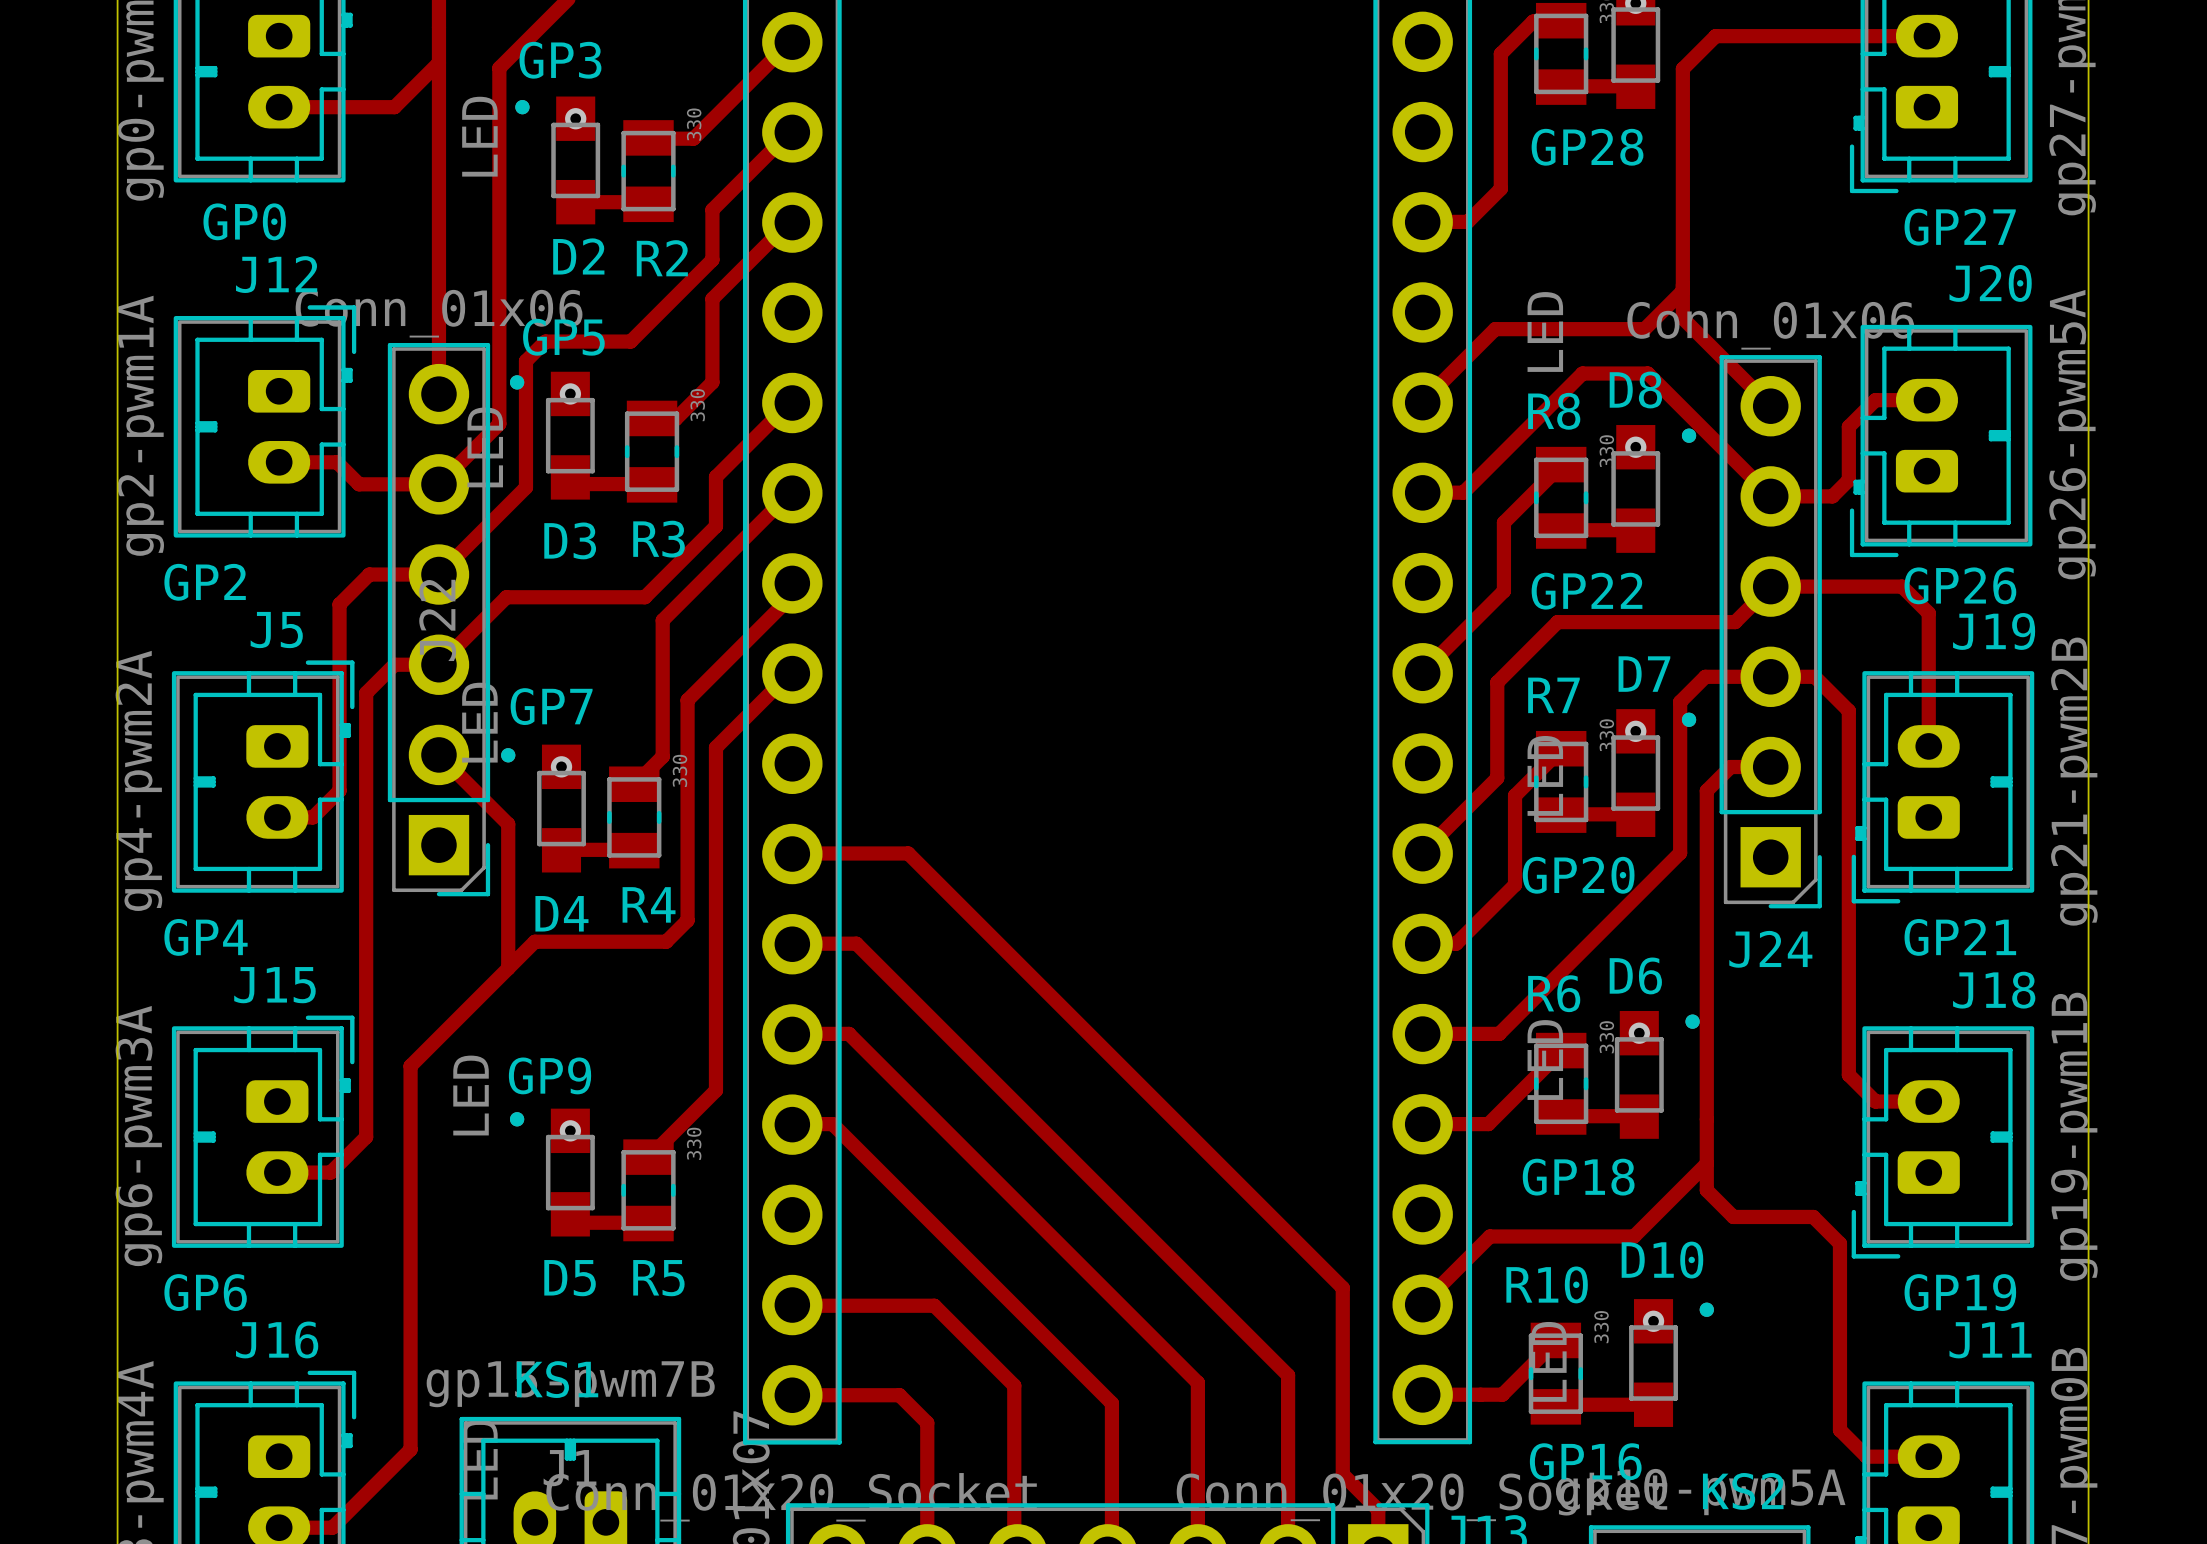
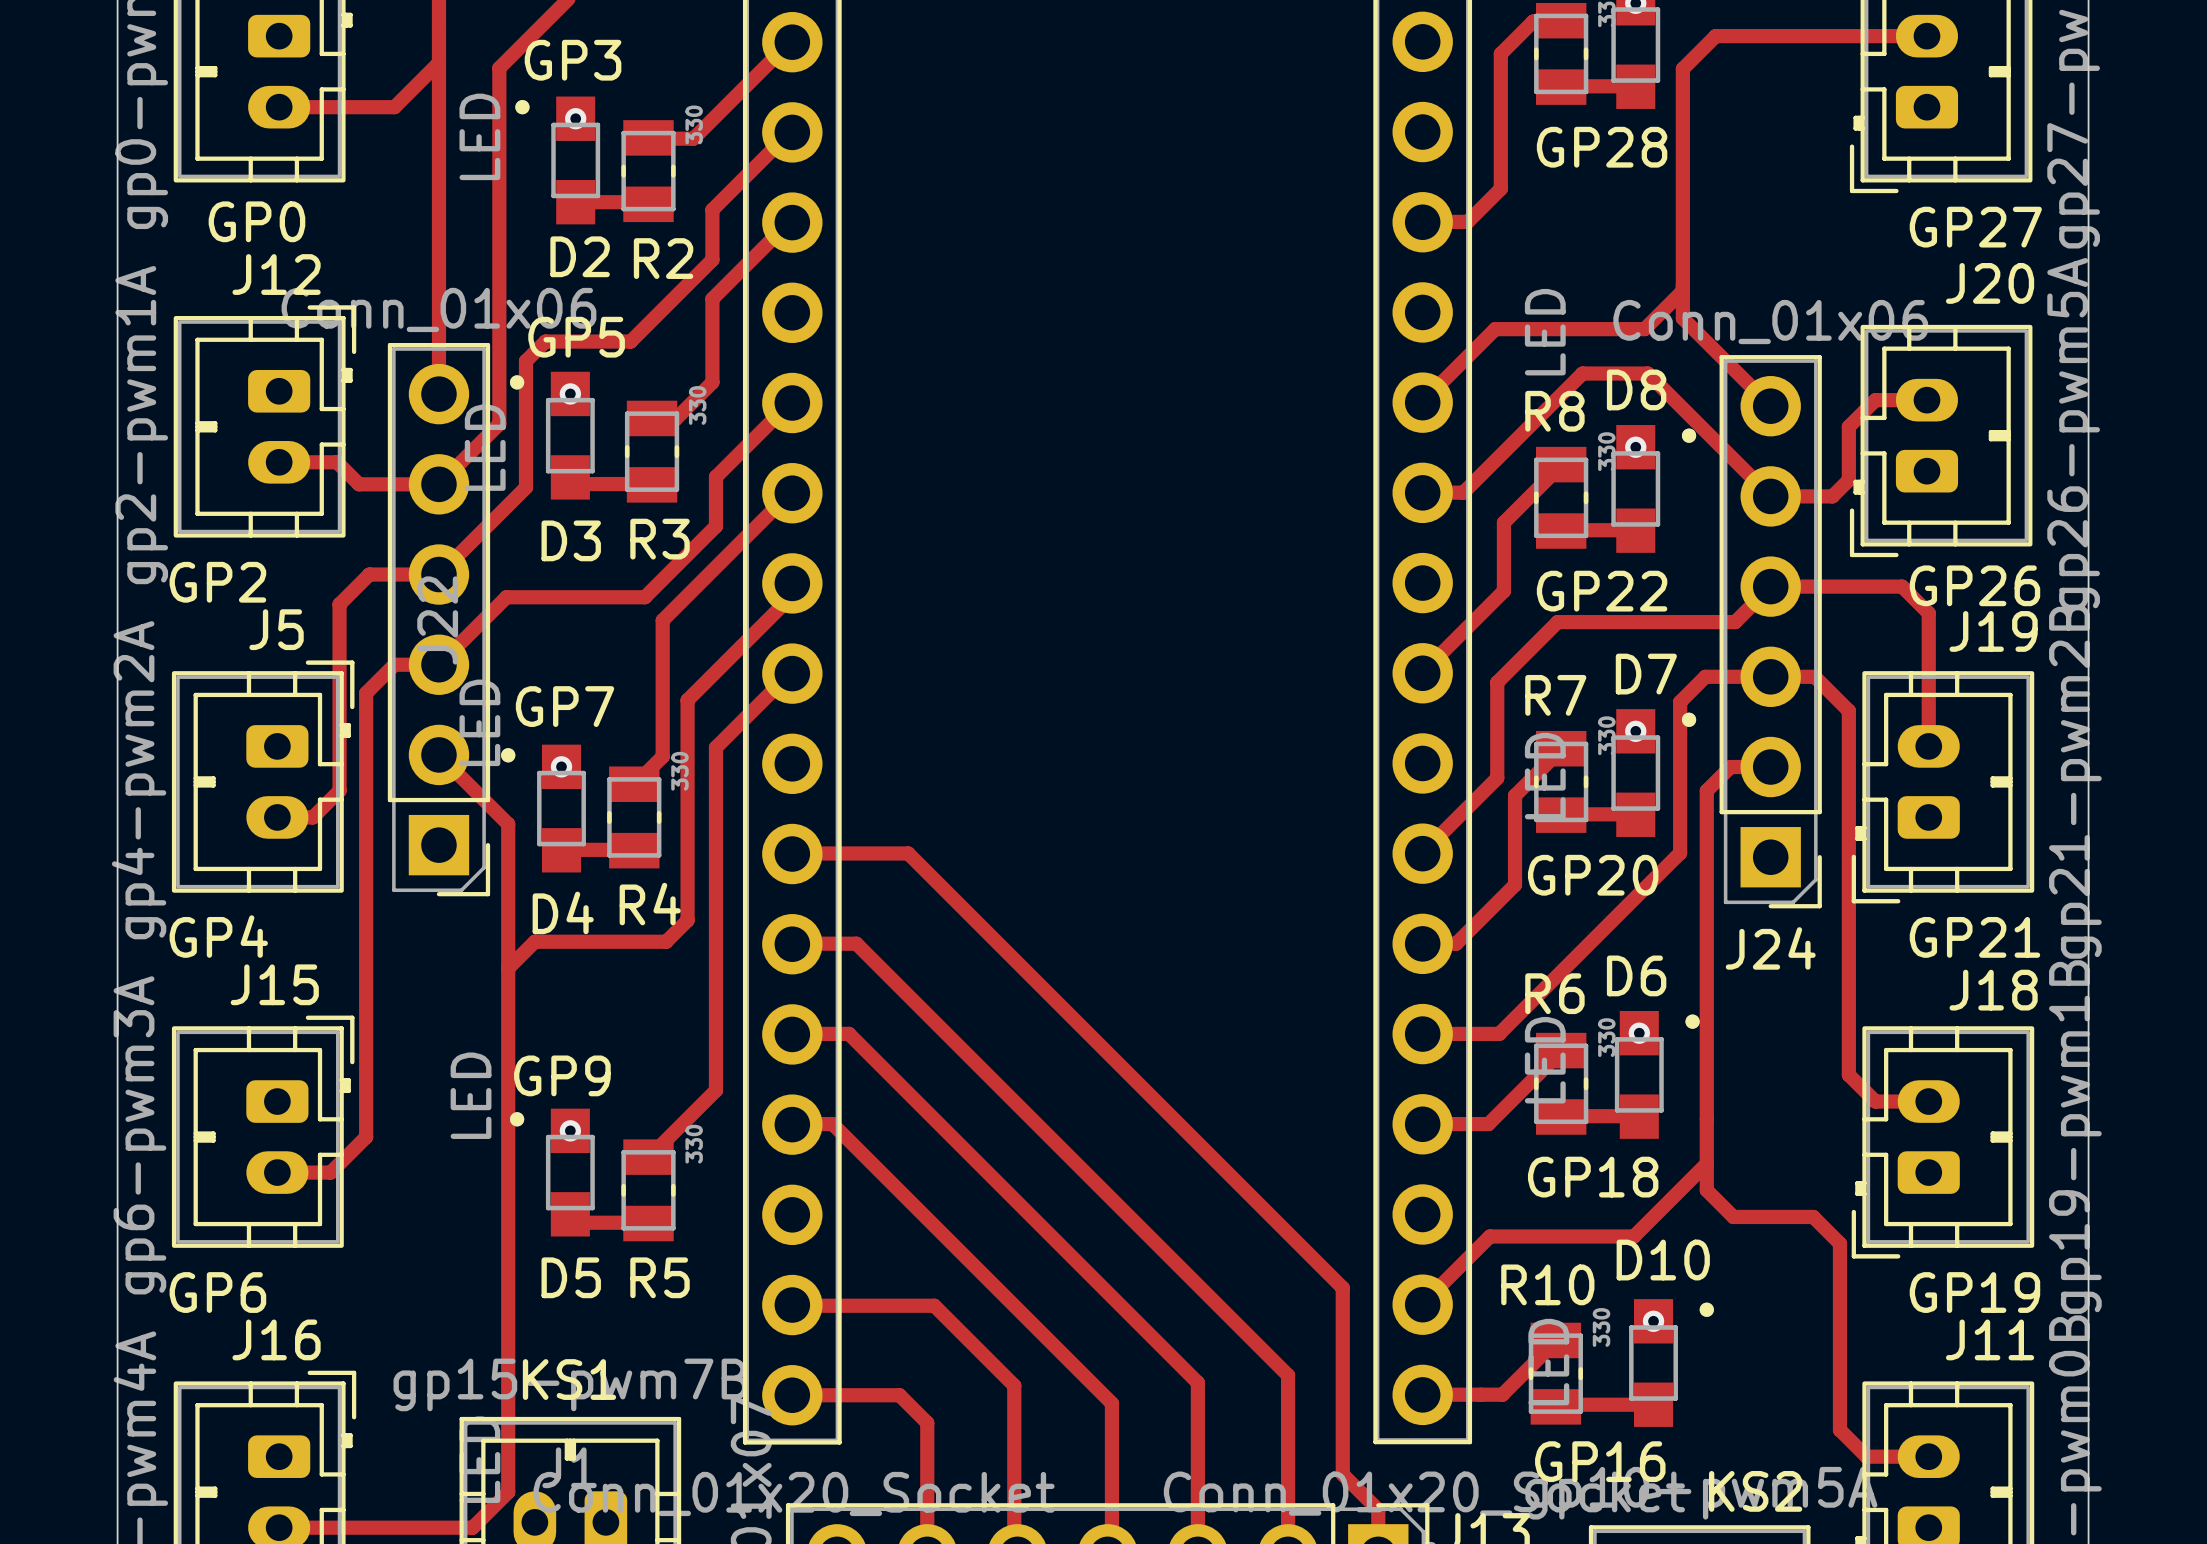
track: (508, 968) (410, 1066) (410, 1449) (332, 1527) -> (508, 968) (508, 1492) (472, 1527) (332, 1527)

